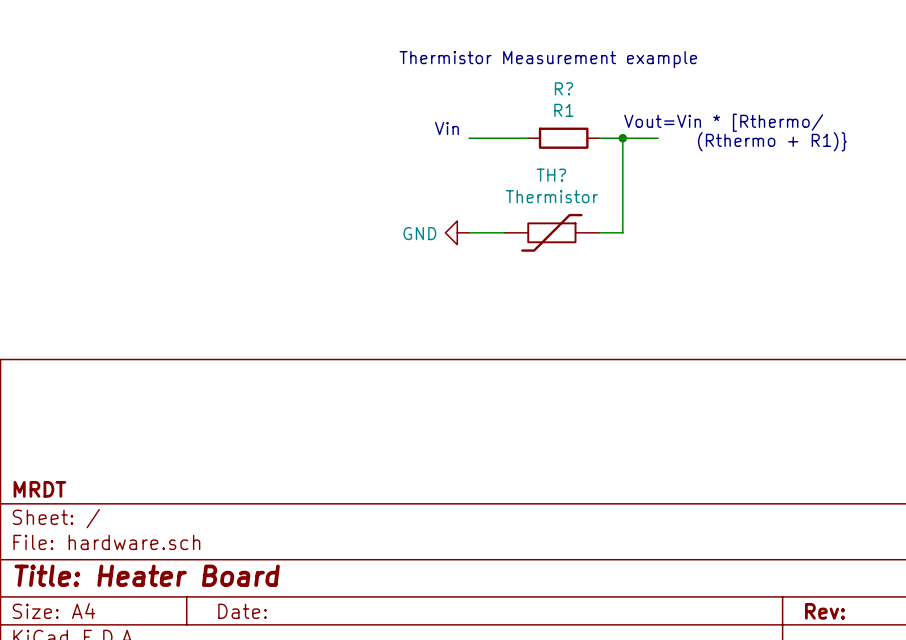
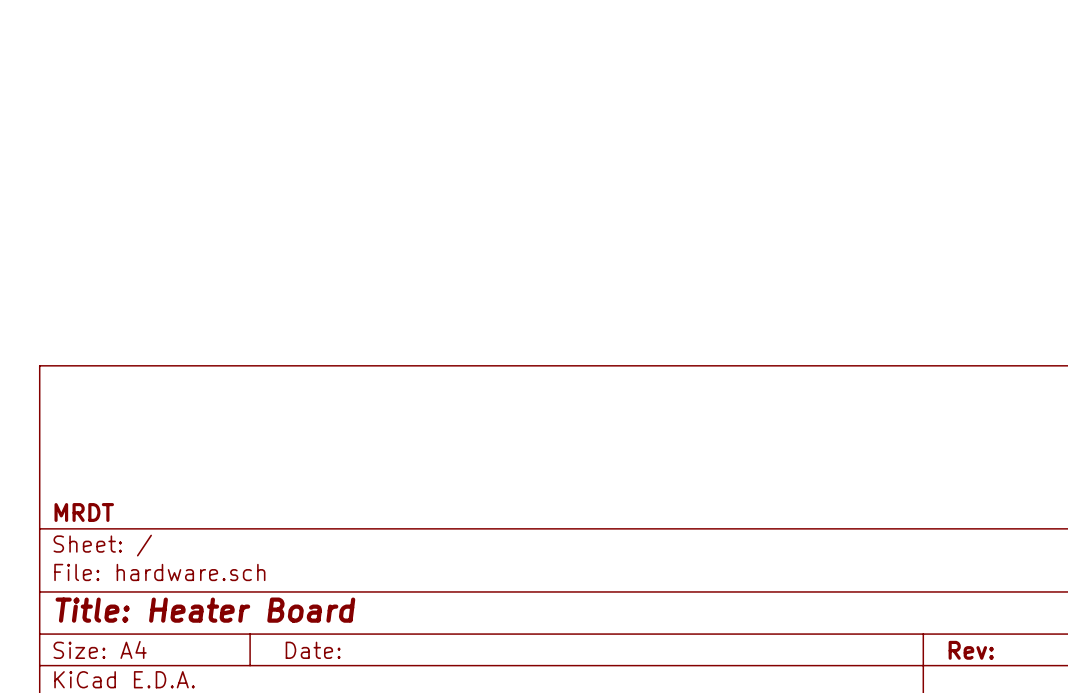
text: Thermistor Measurement example (548, 59) -> none
text: Vout=Vin * [Rthermo/ (723, 122) -> none
text: Vin (446, 128) -> none
wire: (469, 138) (528, 138) -> none
R?: R1 (563, 138) -> none
wire: (599, 138) (658, 138) -> none
wire: (622, 138) (622, 232) (599, 232) -> none
junction: (622, 138) -> none
text: (Rthermo + R1)} (772, 141) -> none
power symbol: GND (457, 232) -> none
wire: (469, 232) (504, 232) -> none
TH?: Thermistor (551, 232) -> none

